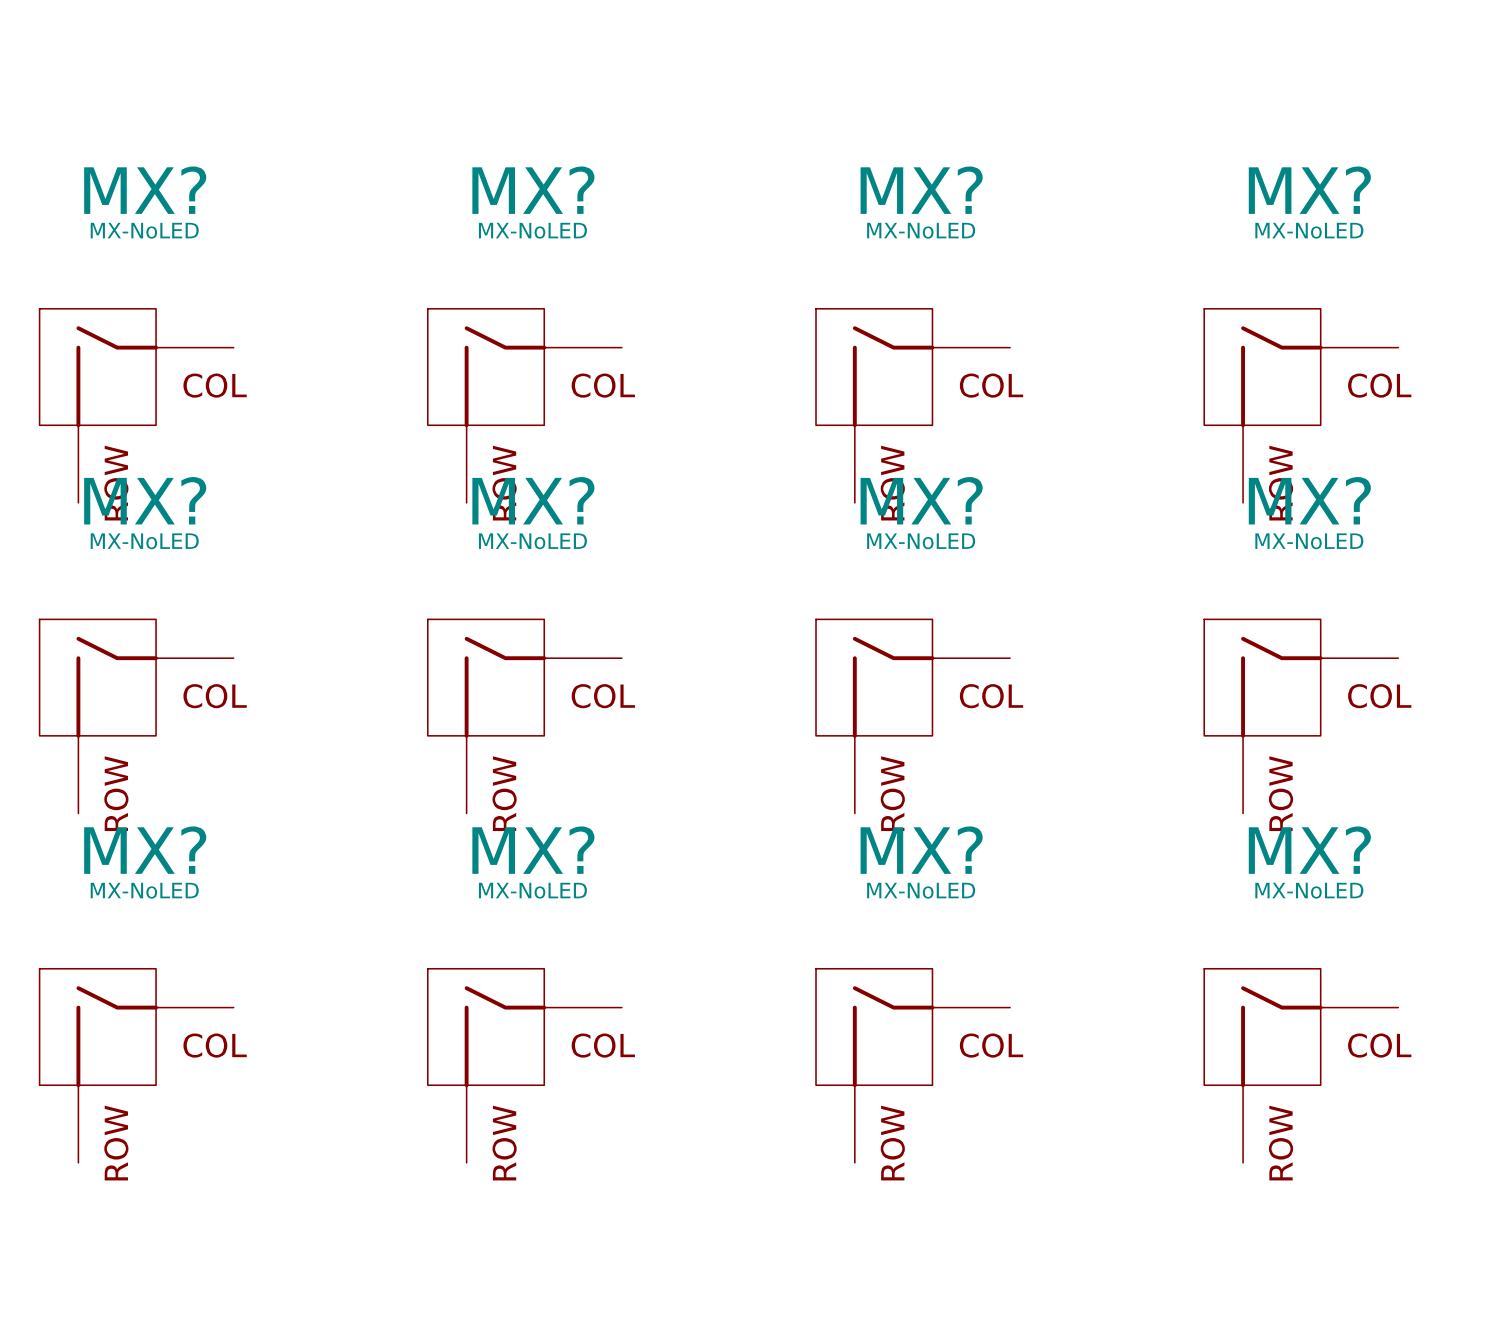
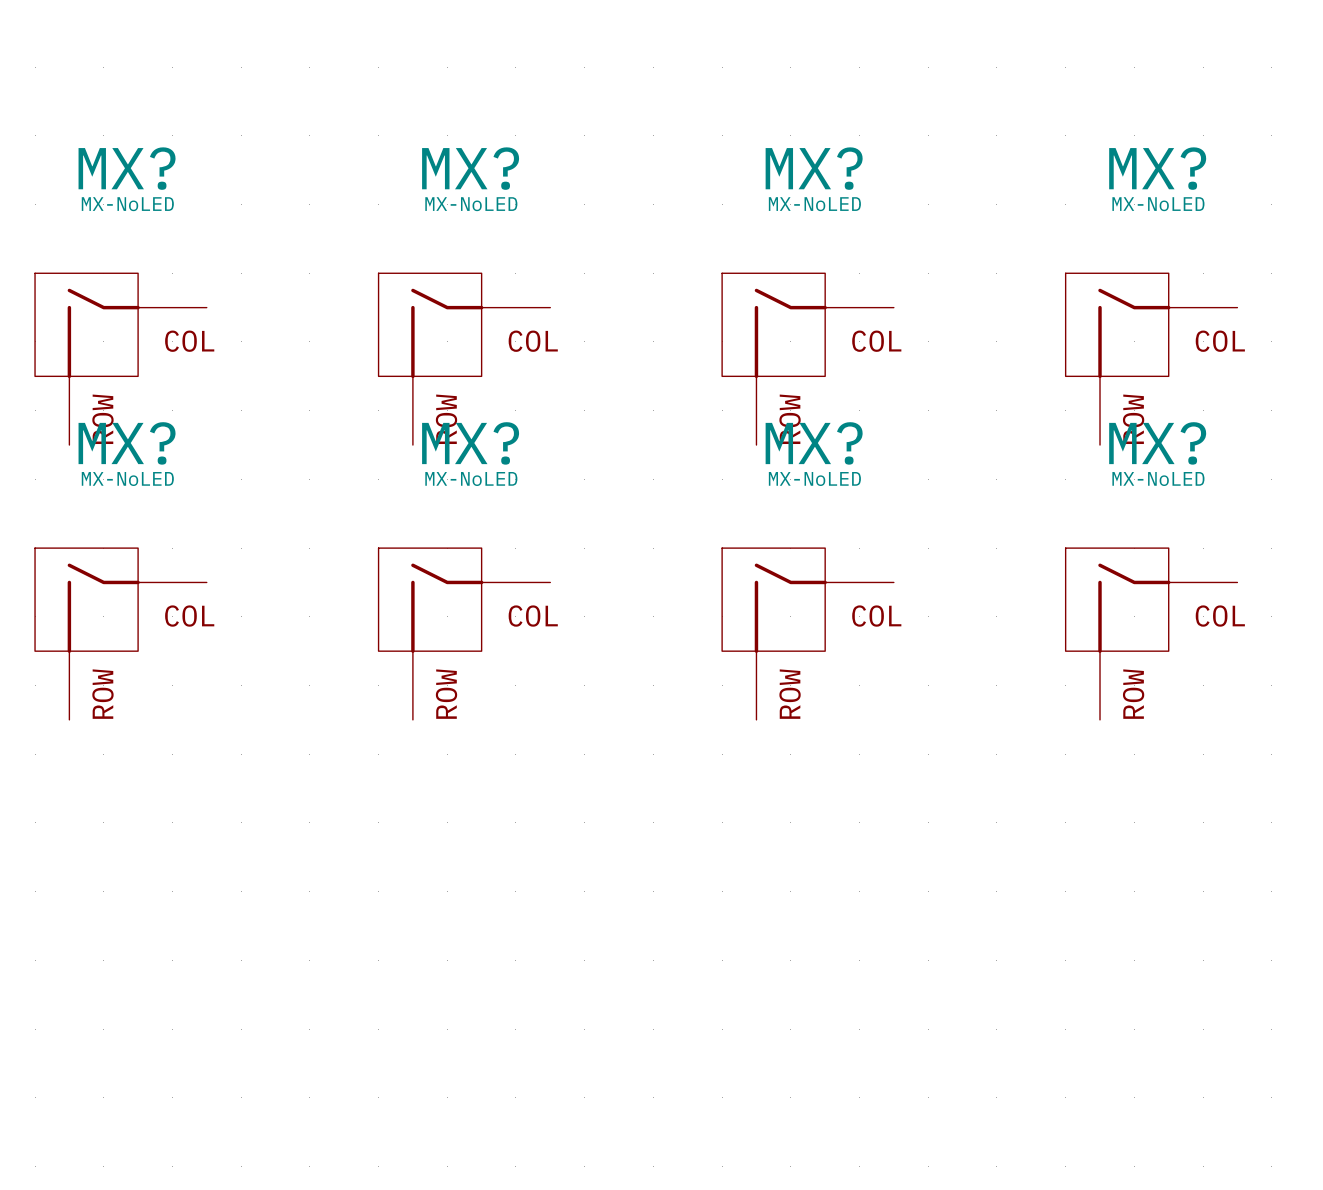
MX?: MX-NoLED (136, 1065) -> none
MX?: MX-NoLED (524, 1065) -> none
MX?: MX-NoLED (913, 1065) -> none
MX?: MX-NoLED (1301, 1065) -> none

